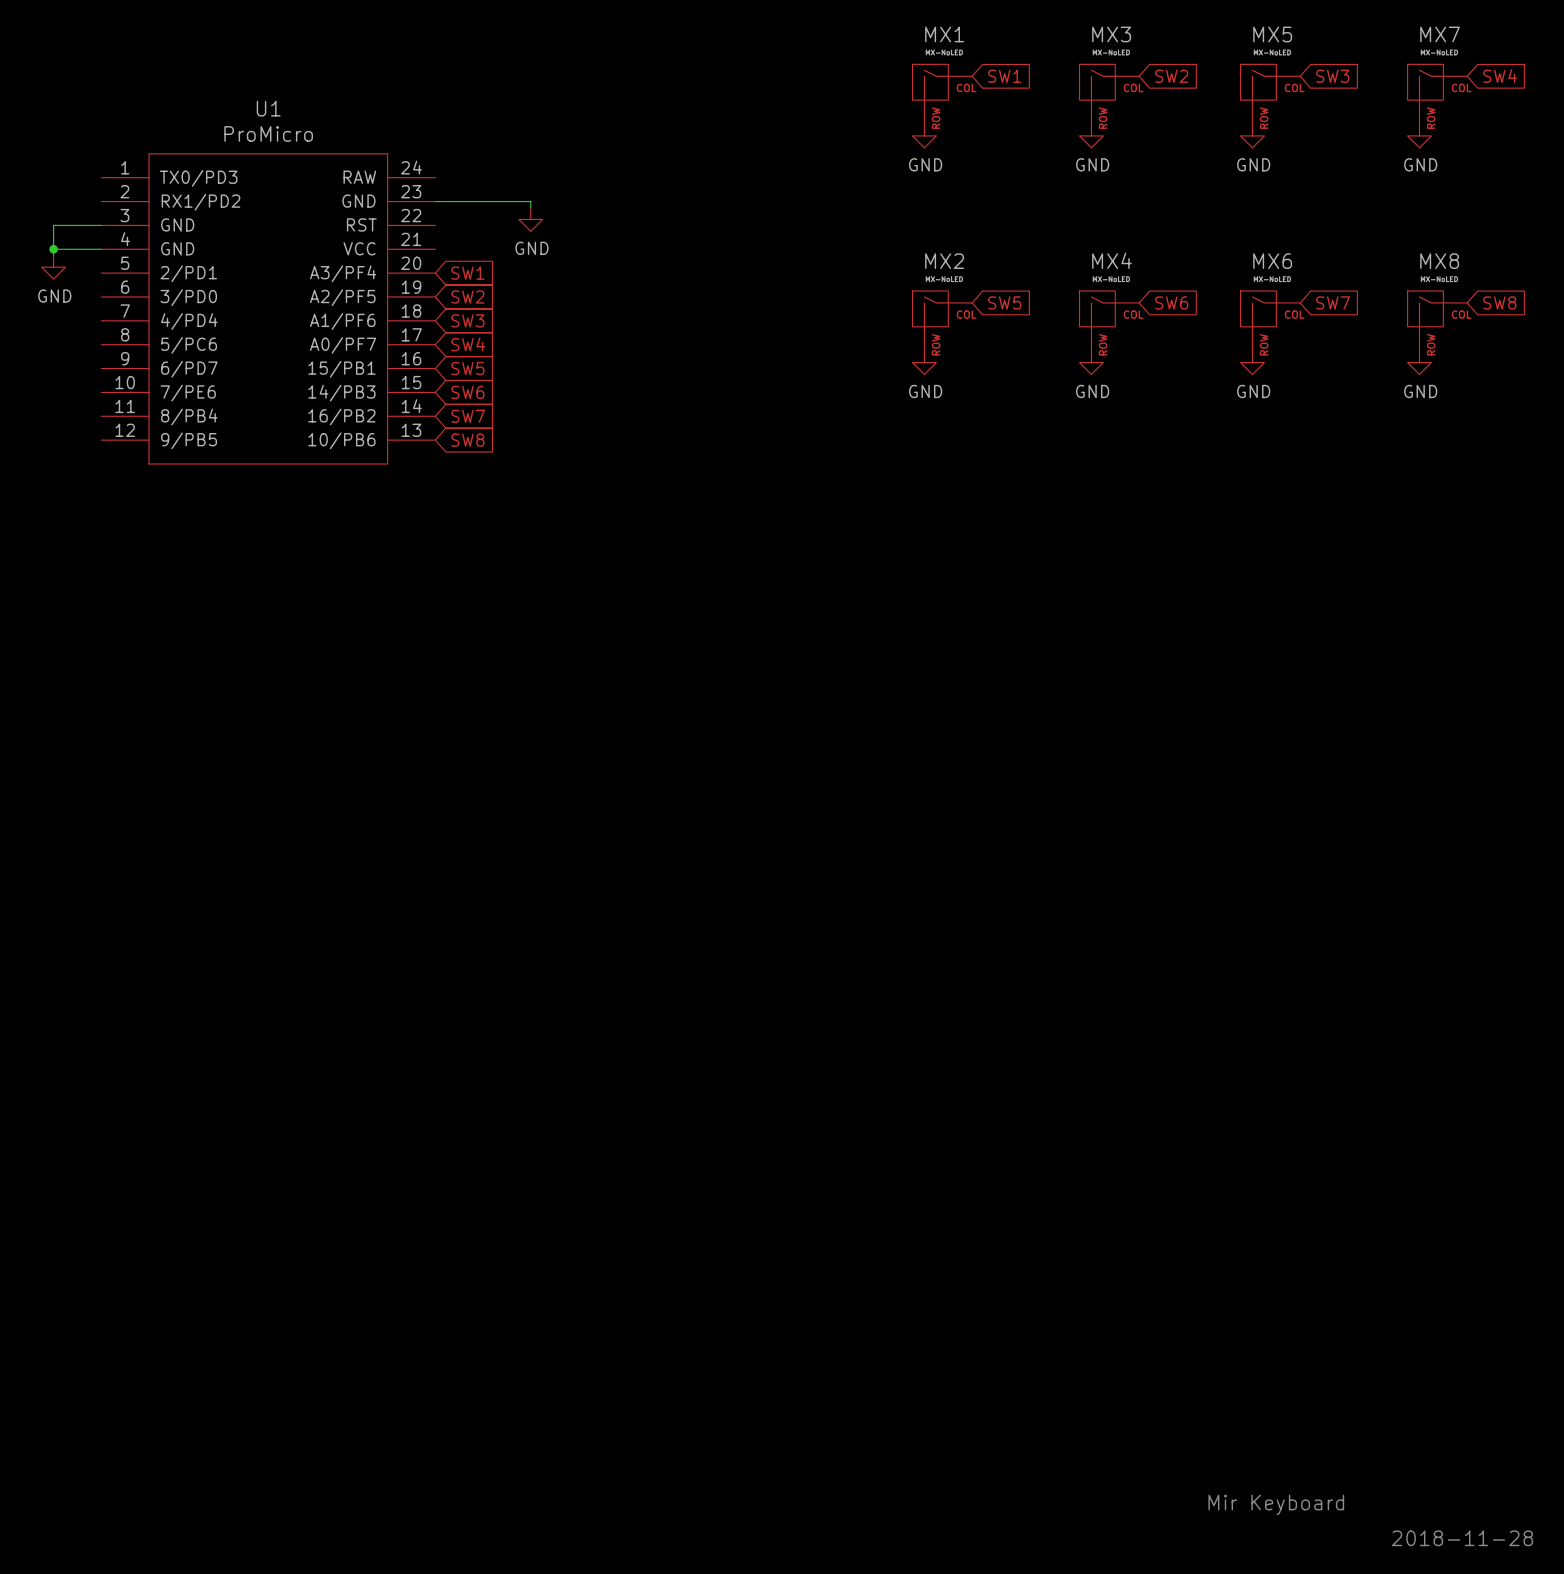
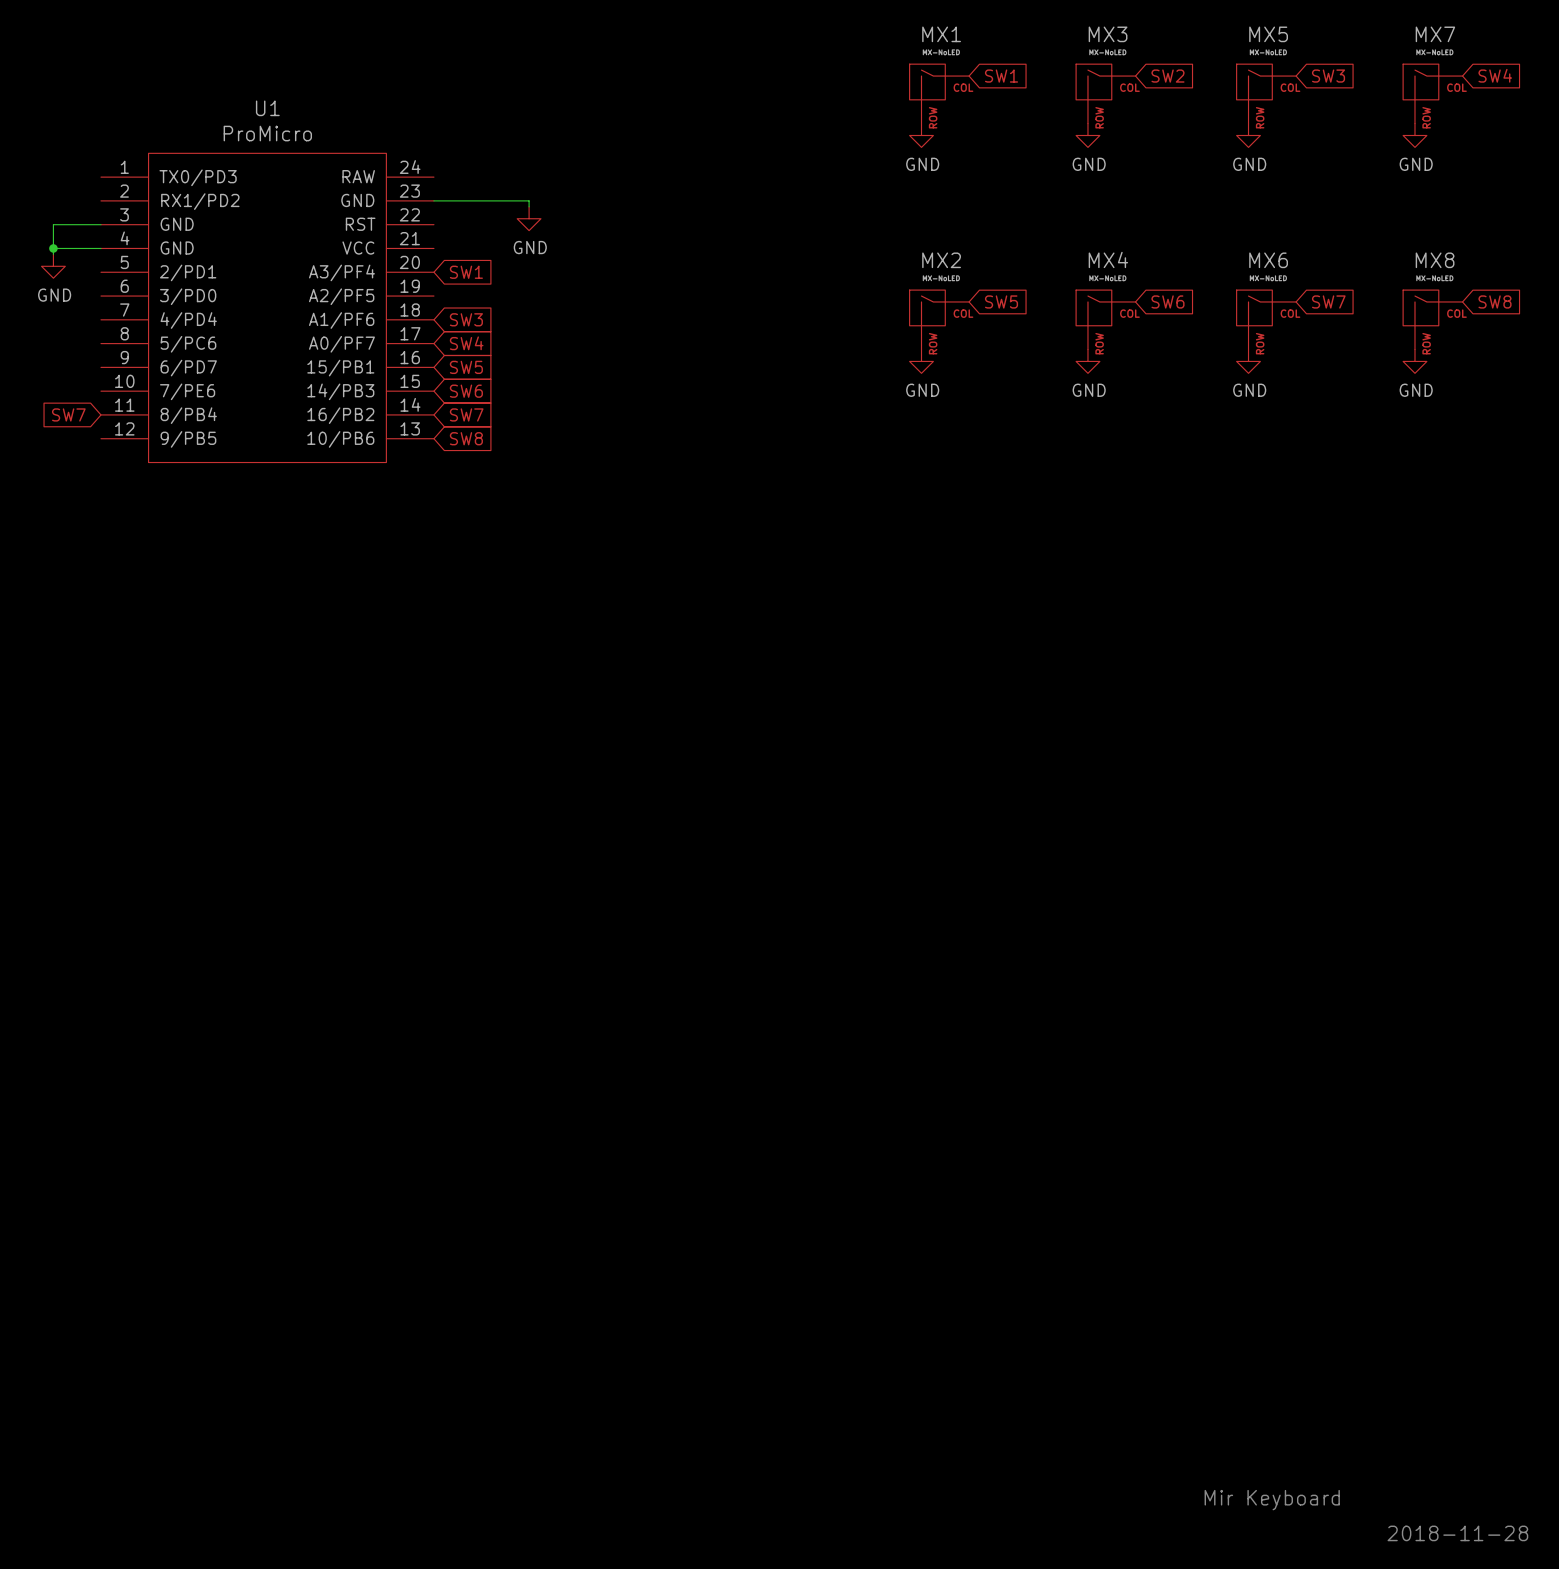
global label: SW2 (467, 296) -> none
global label: none -> SW7 (68, 414)

